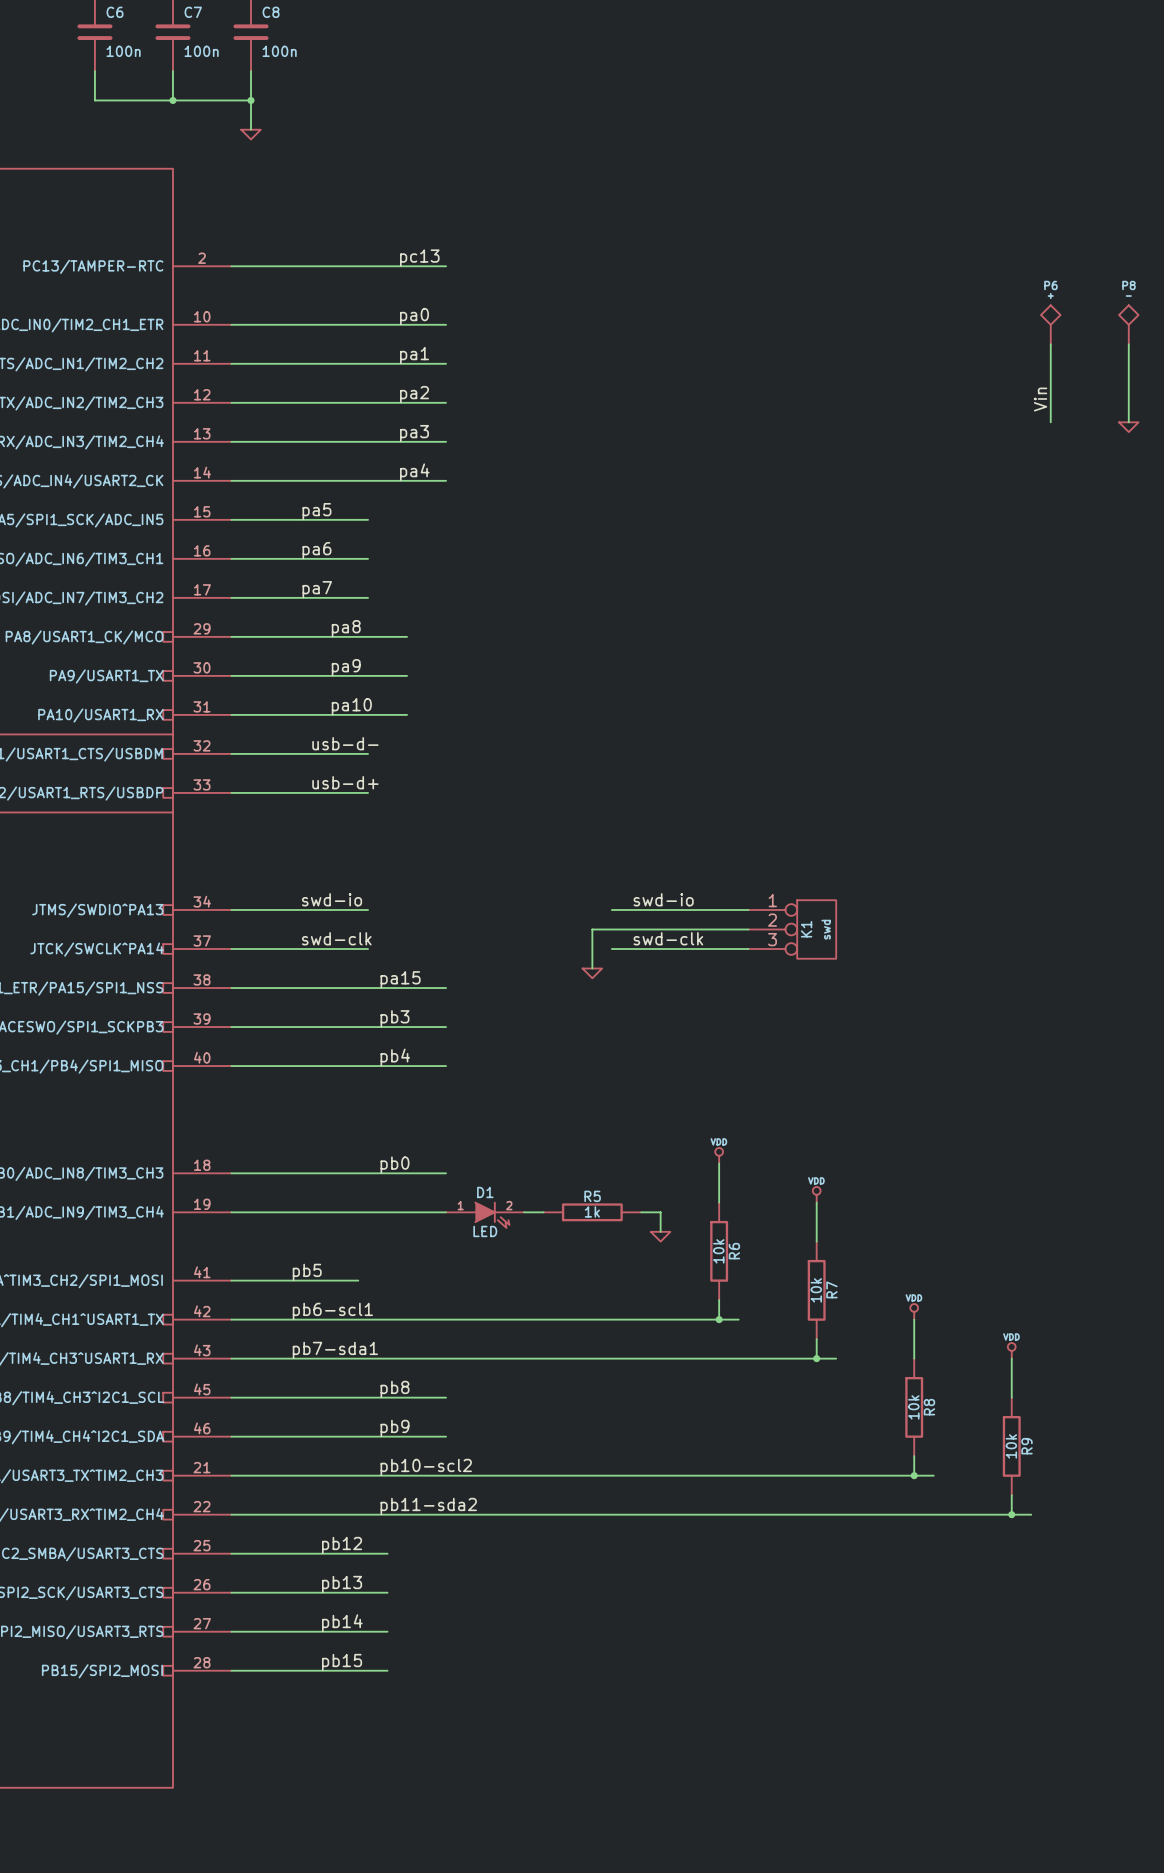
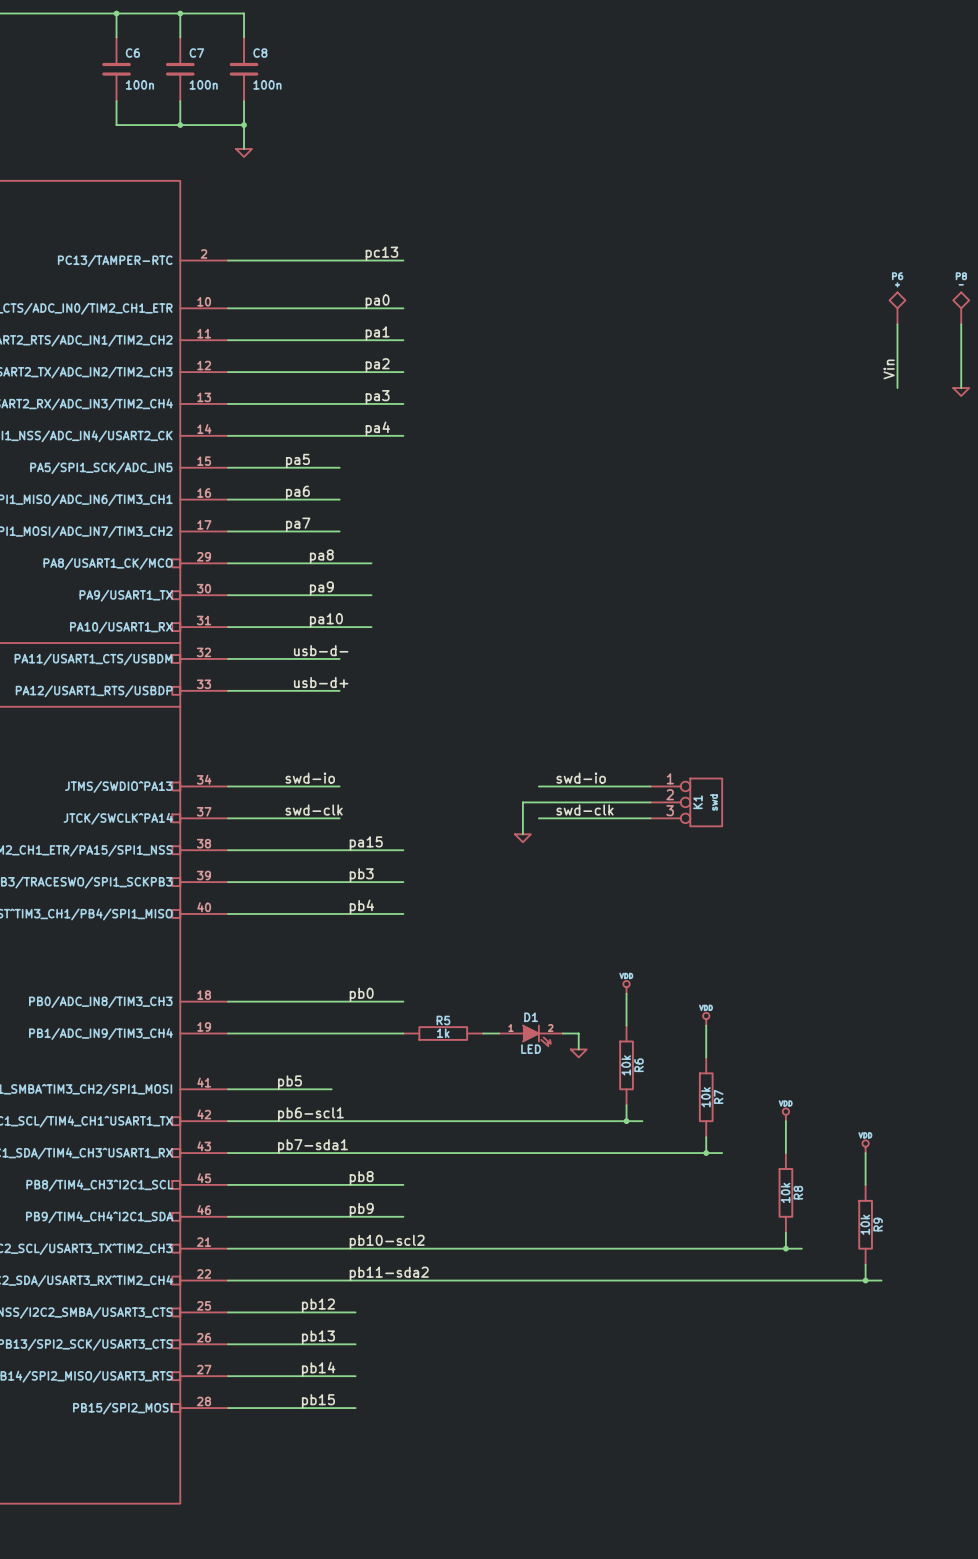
R5 position: (592, 1212) -> (443, 1033)
D1 position: (485, 1215) -> (530, 1035)

